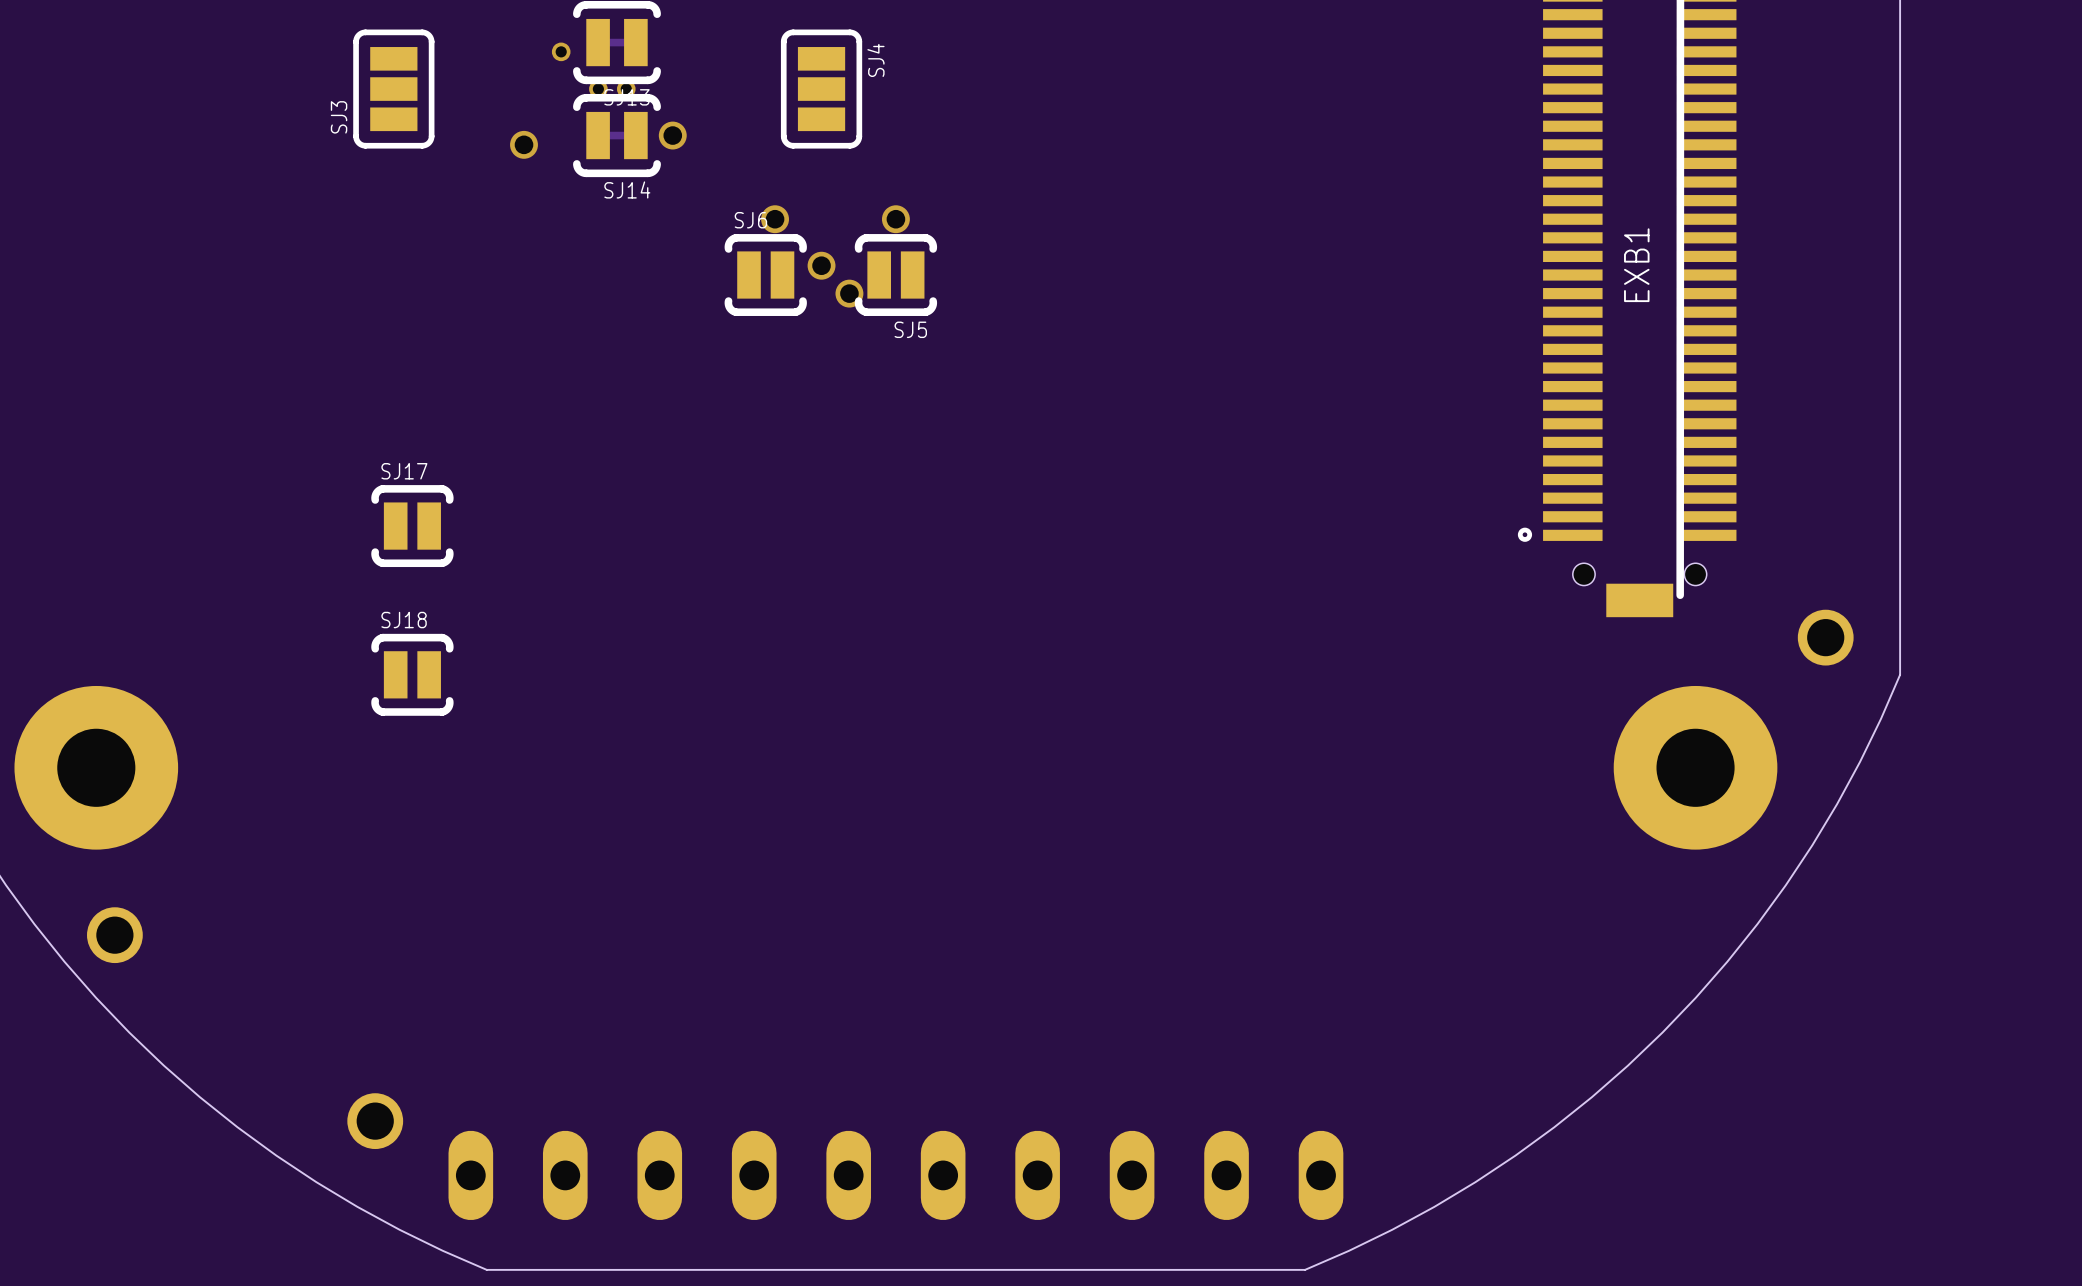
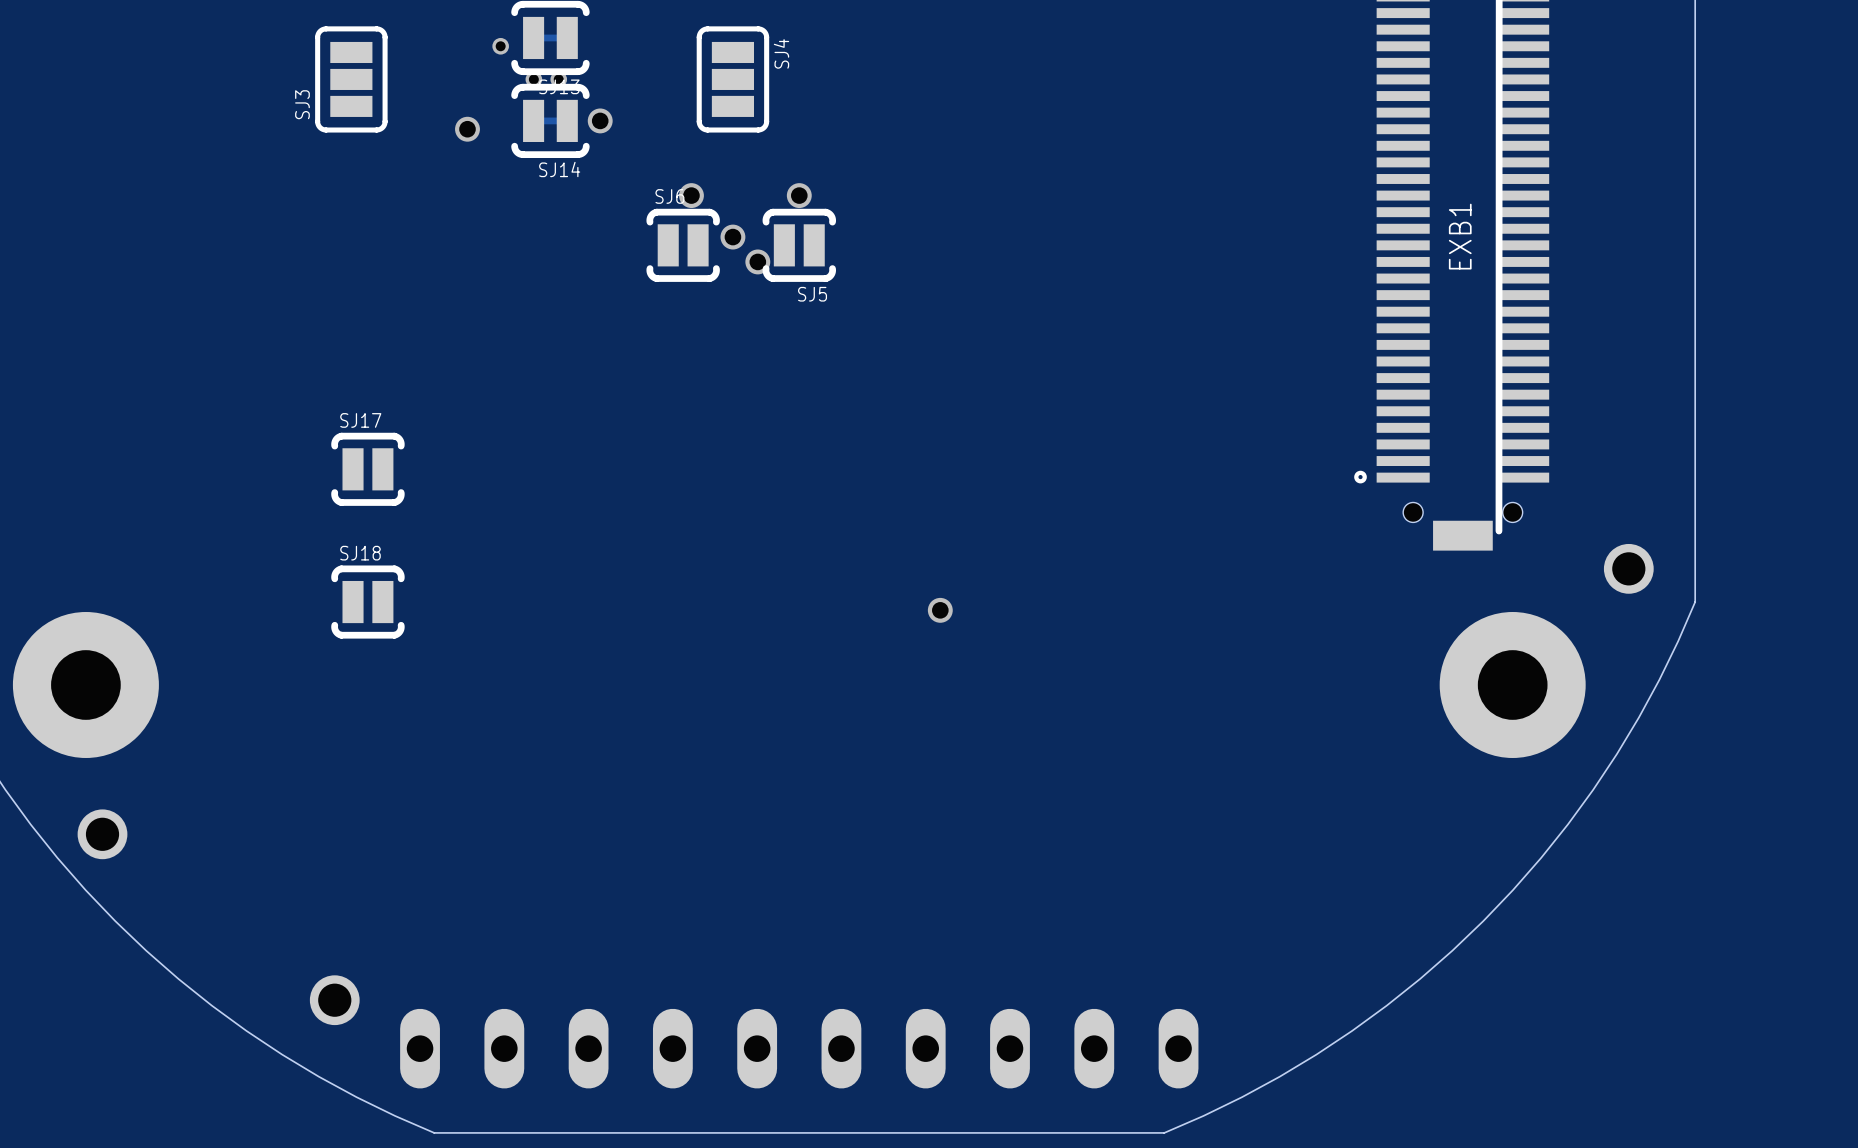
via: none -> (940, 610)

